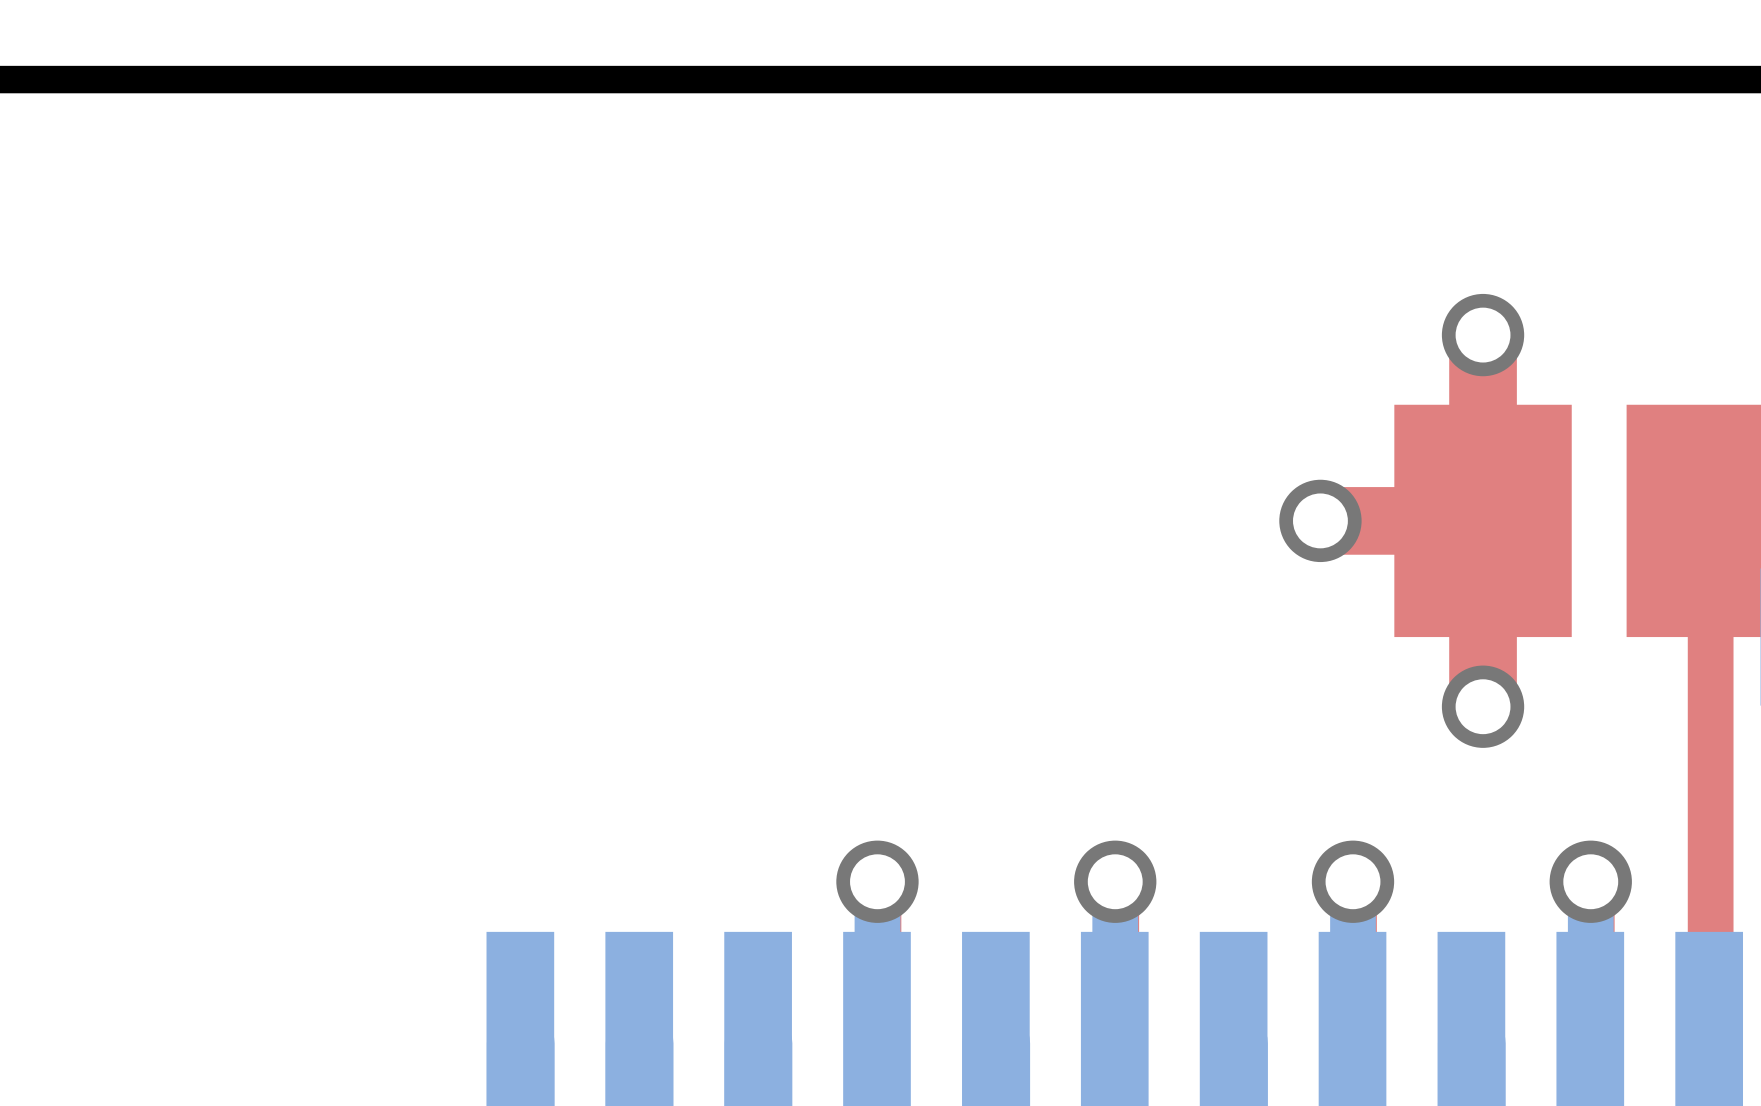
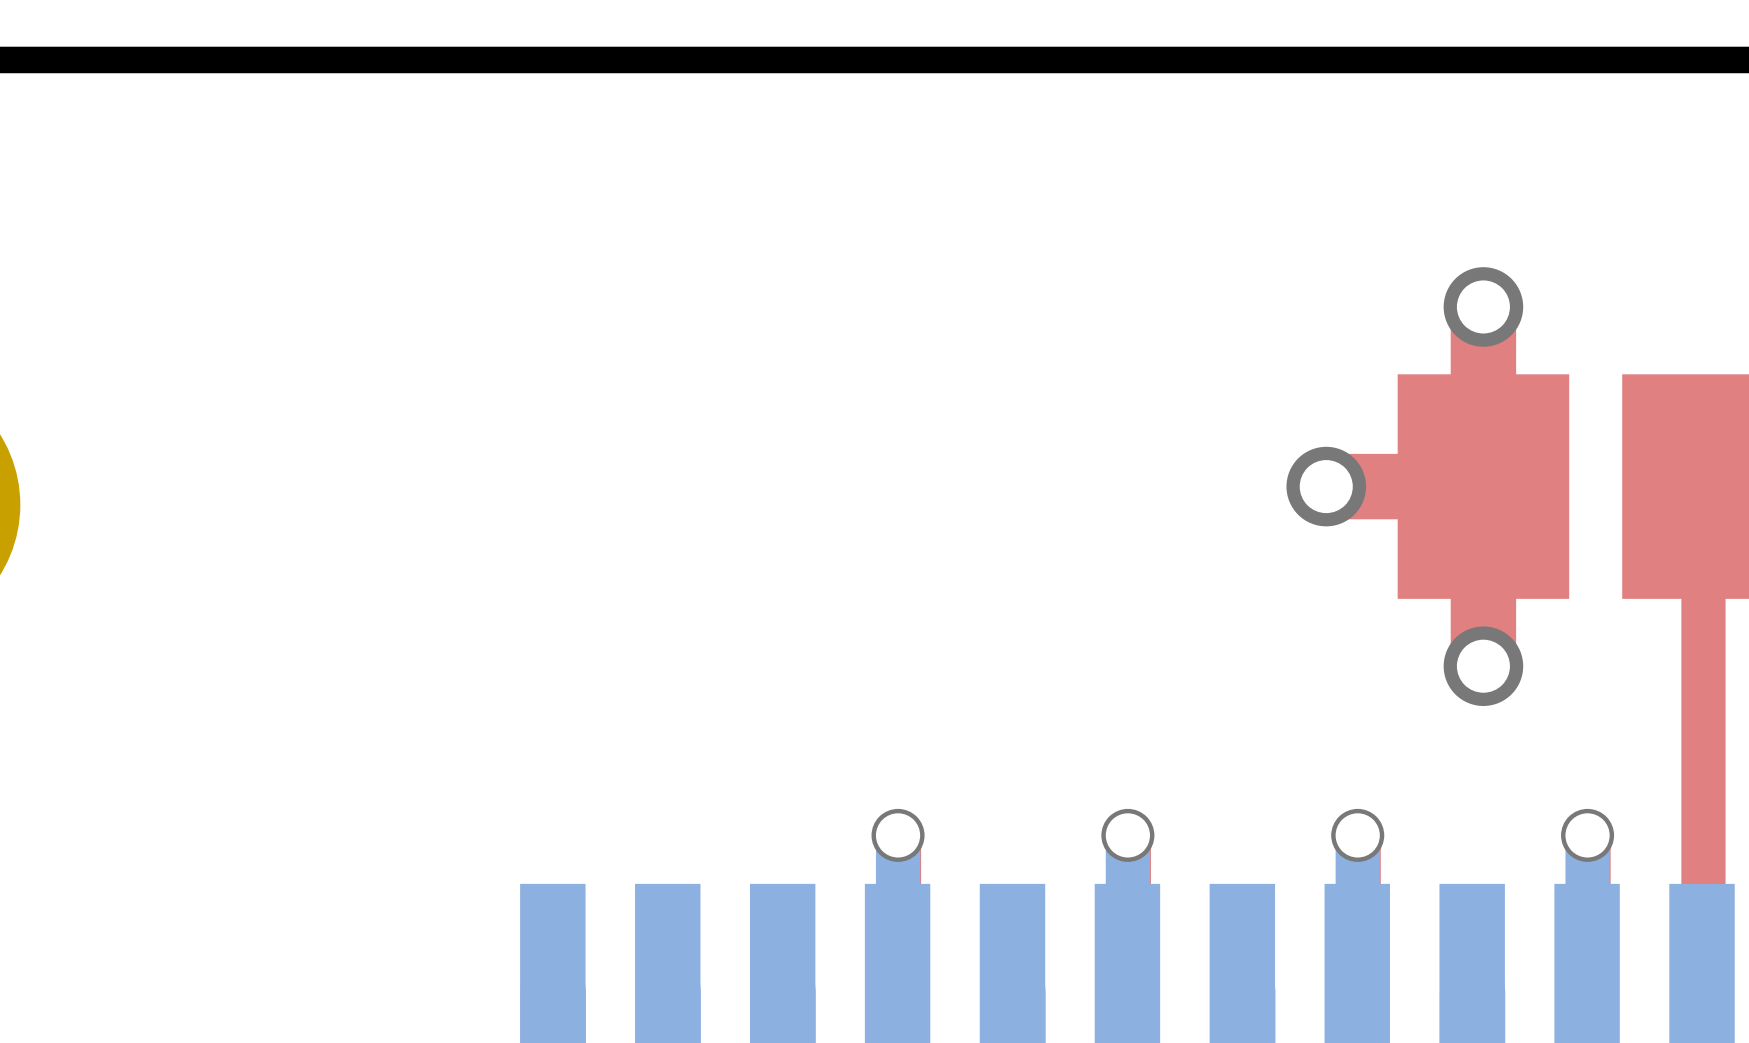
via size: [836, 840, 919, 923] -> [871, 808, 925, 862]
via size: [1074, 840, 1157, 923] -> [1101, 808, 1155, 862]
via size: [1311, 840, 1395, 923] -> [1331, 808, 1385, 862]
via size: [1549, 840, 1632, 923] -> [1561, 808, 1615, 862]

